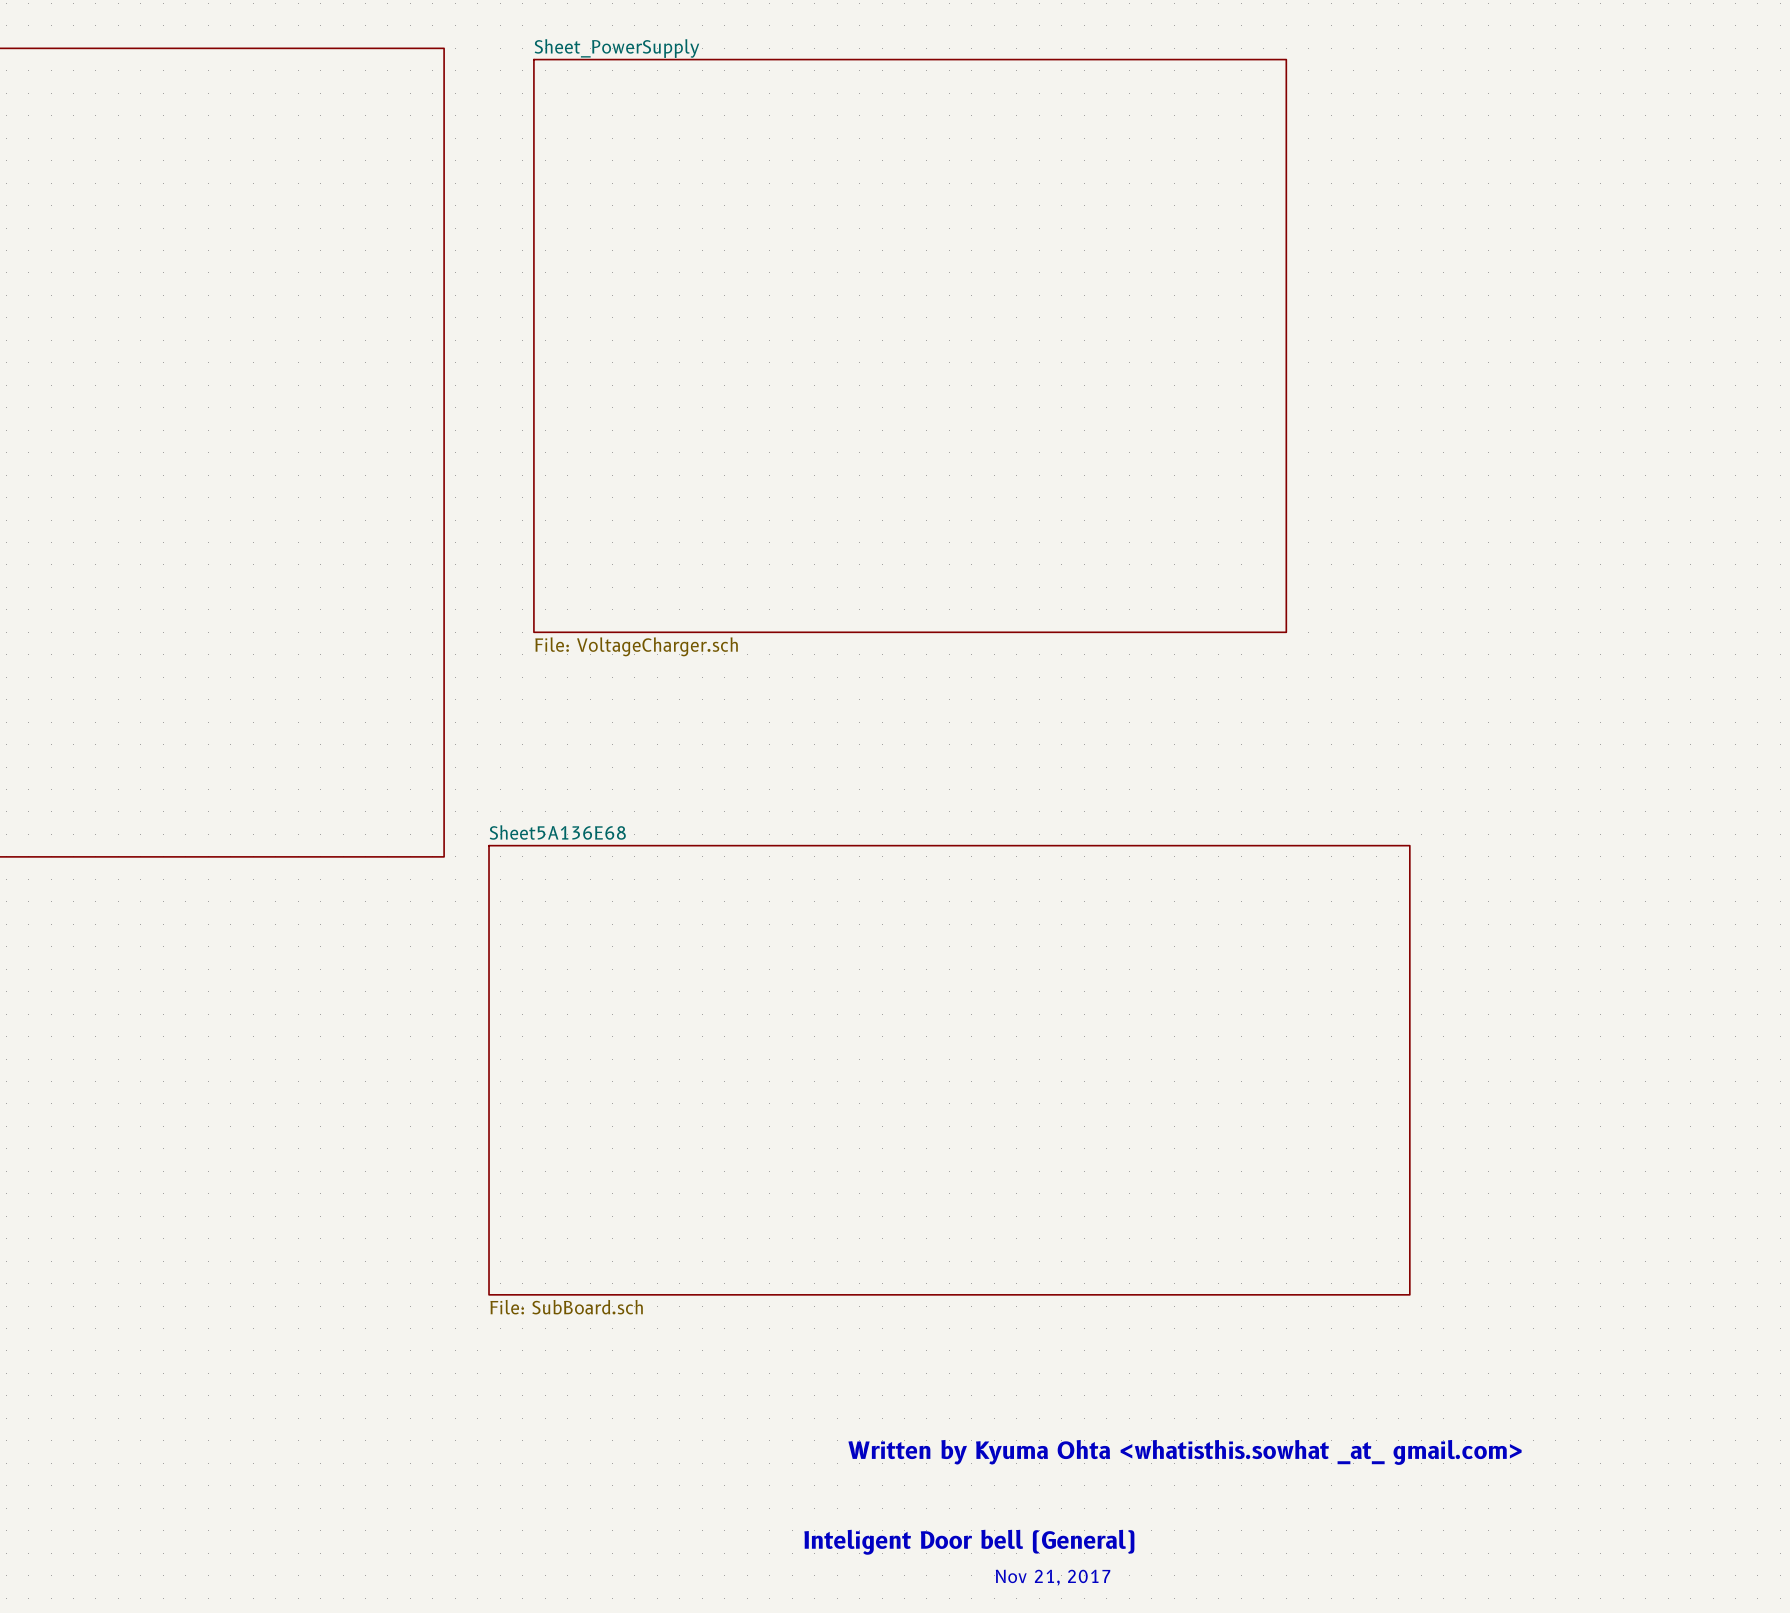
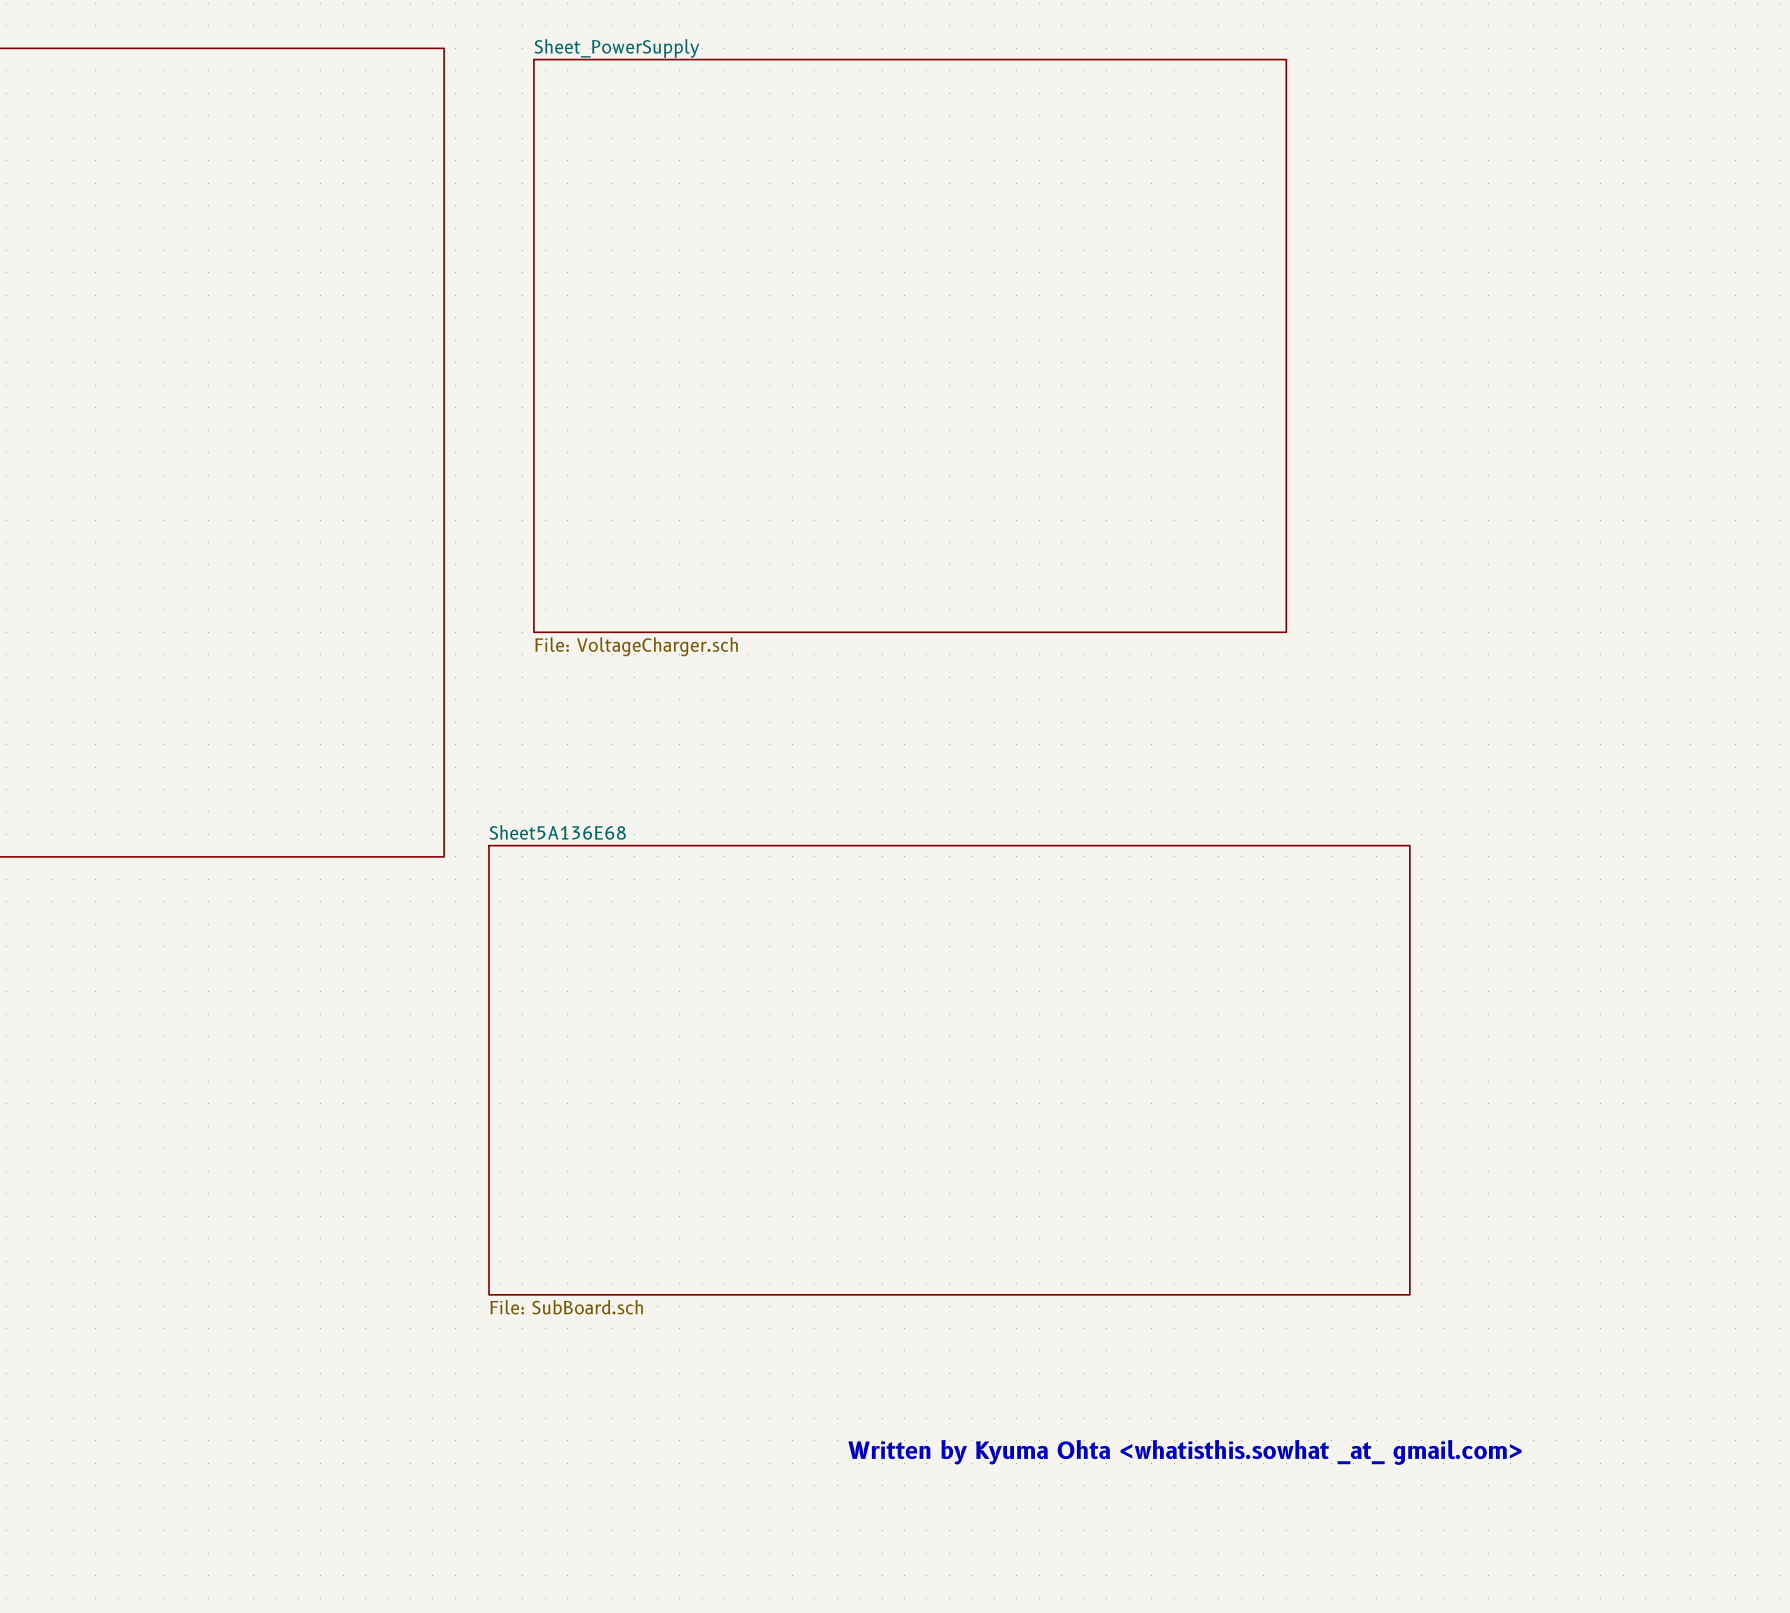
text: Inteligent Door bell (General) (969, 1542) -> none
text: Nov 21, 2017 (1053, 1577) -> none

